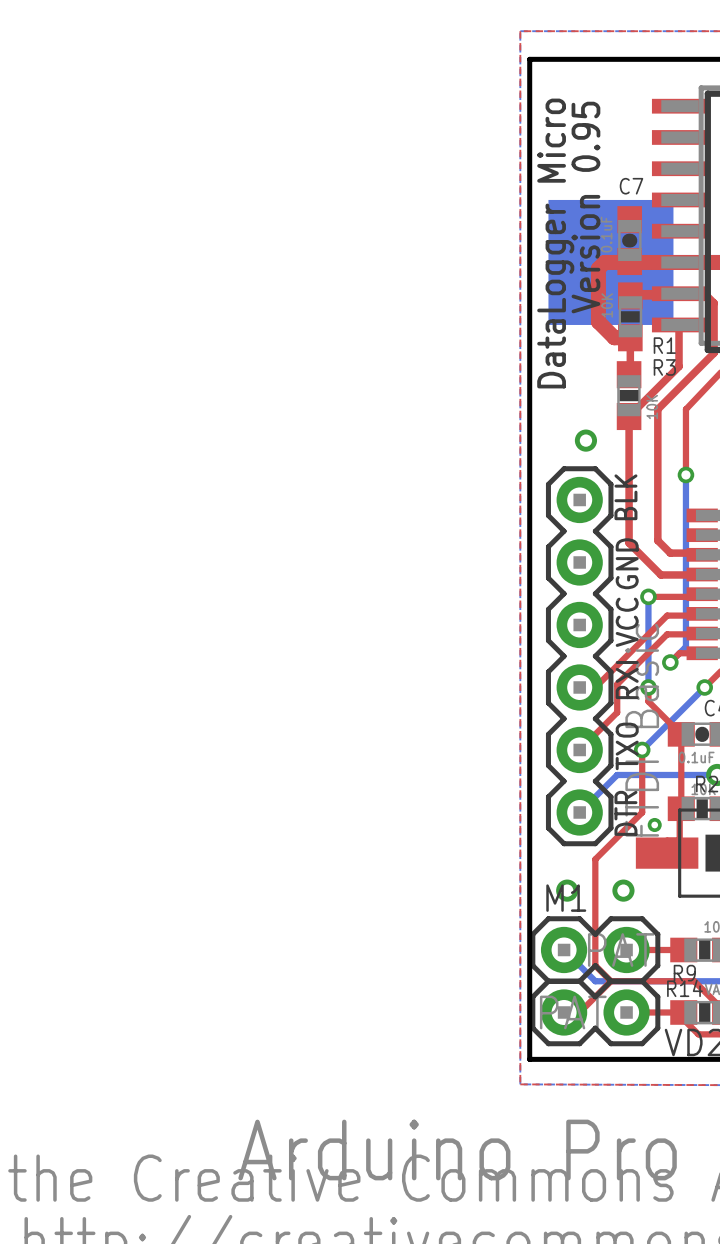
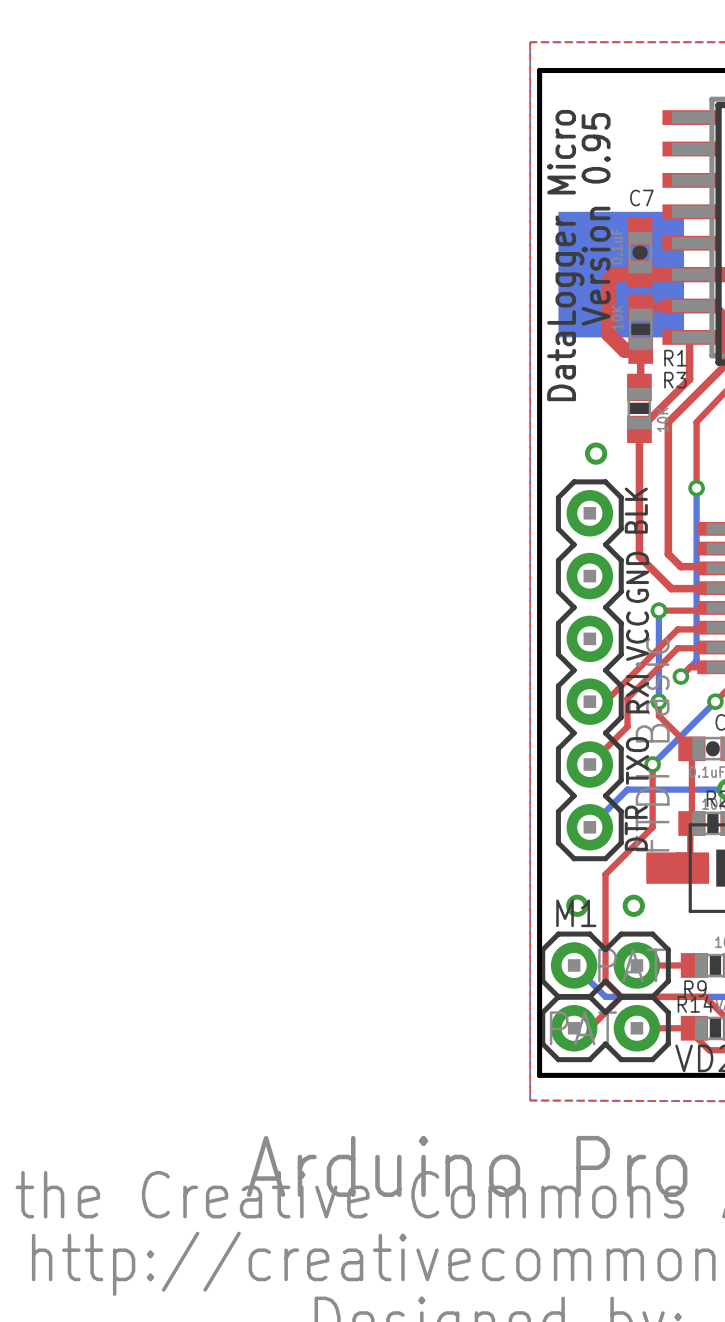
via: (654, 824) -> none

